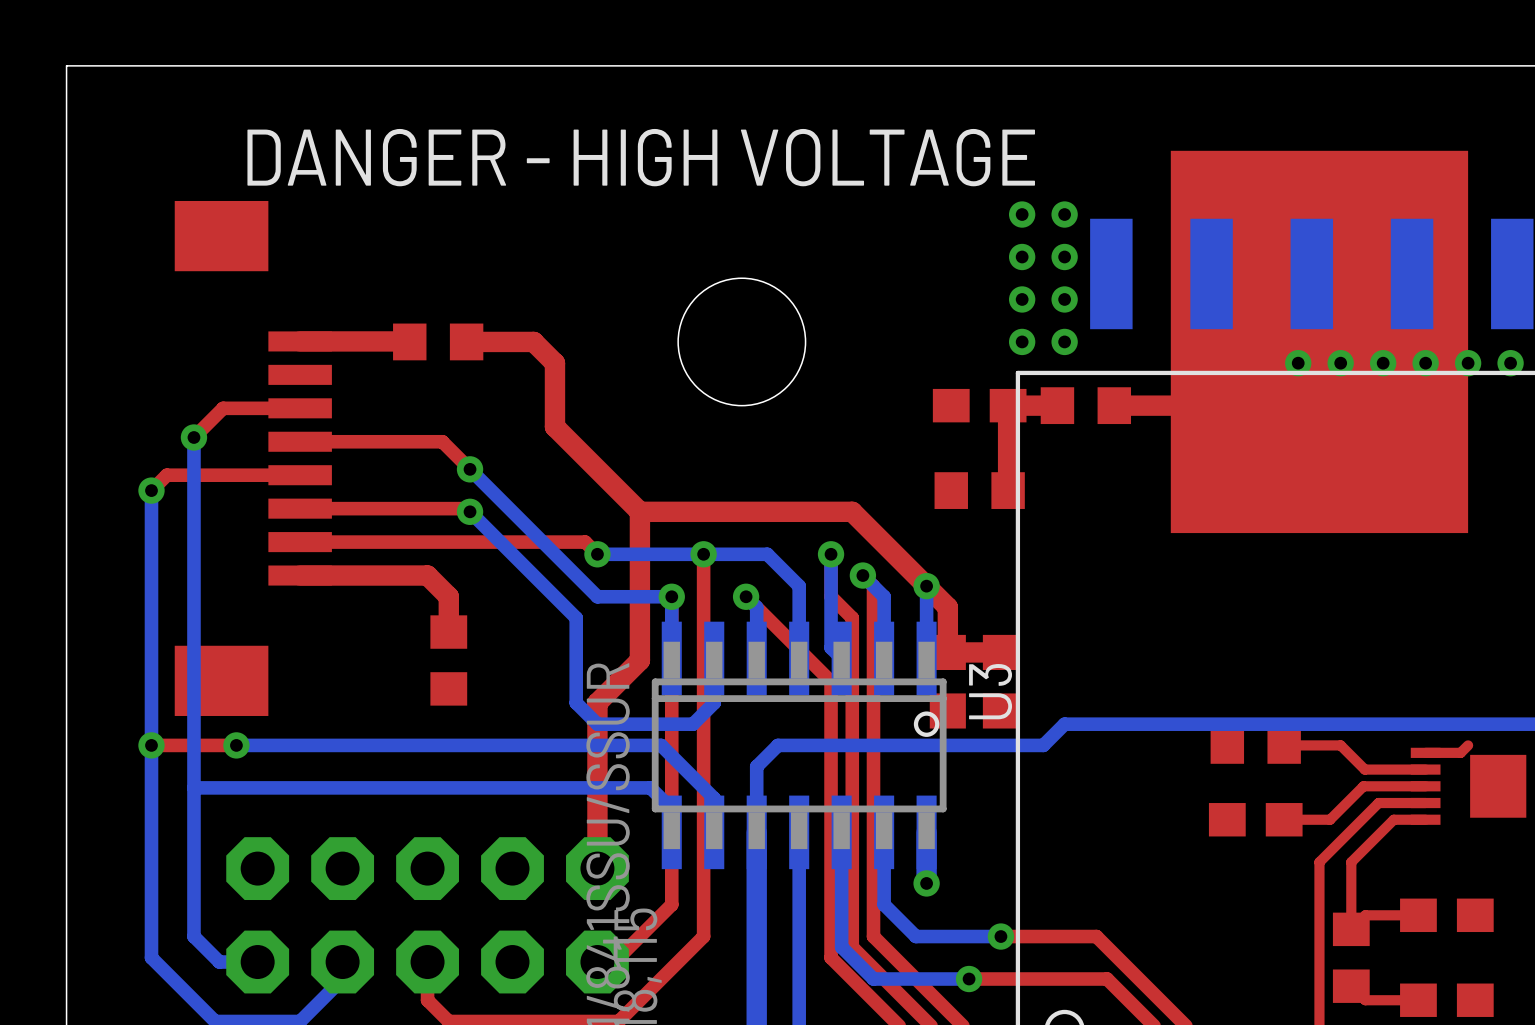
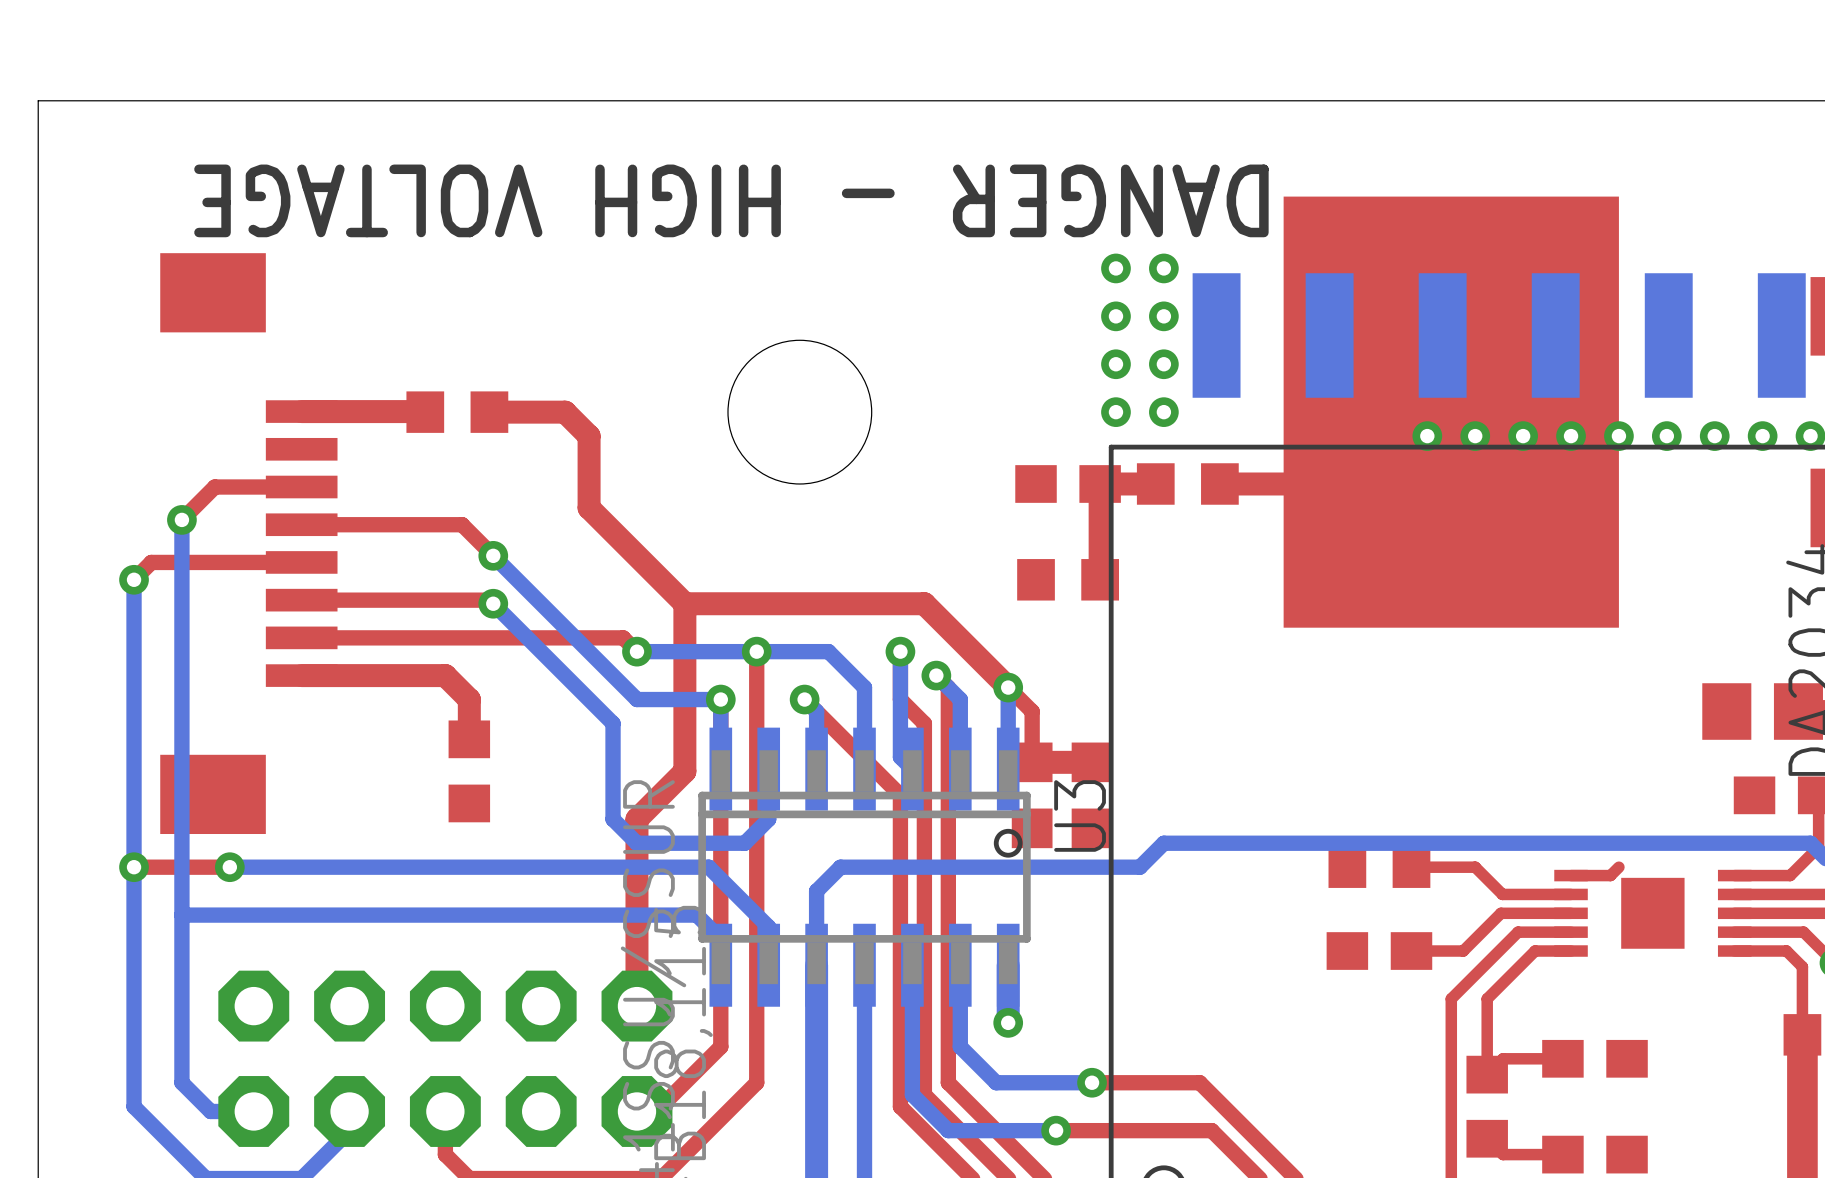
text rotation: 0° (641, 157) -> 180° (731, 200)
top track width: thick (926, 586) (947, 607) (947, 652) -> thin (1008, 687) (1032, 711) (1032, 762)

